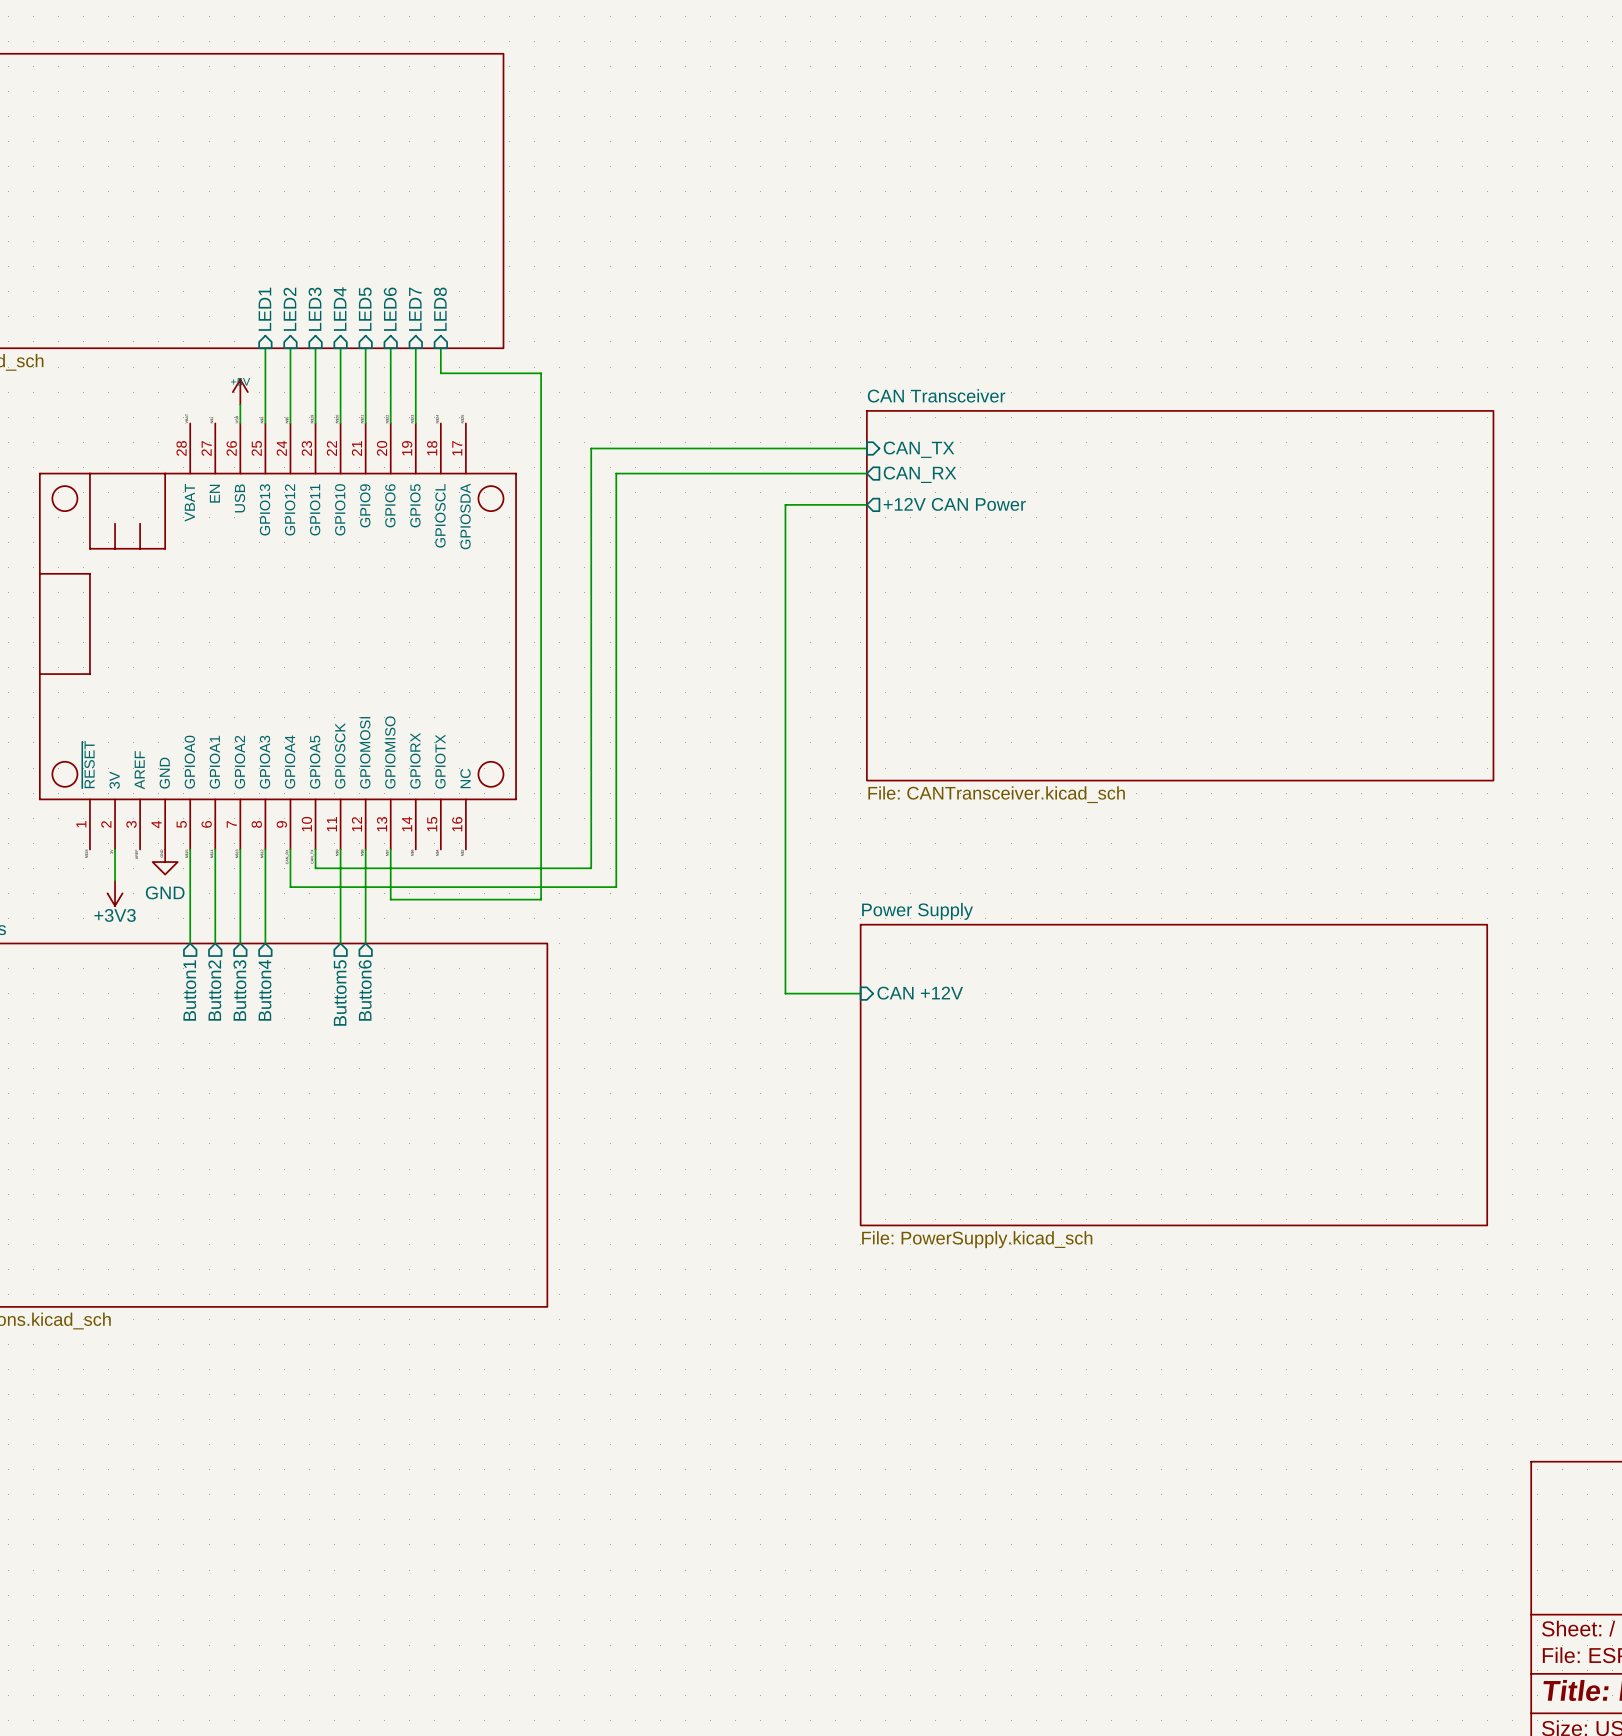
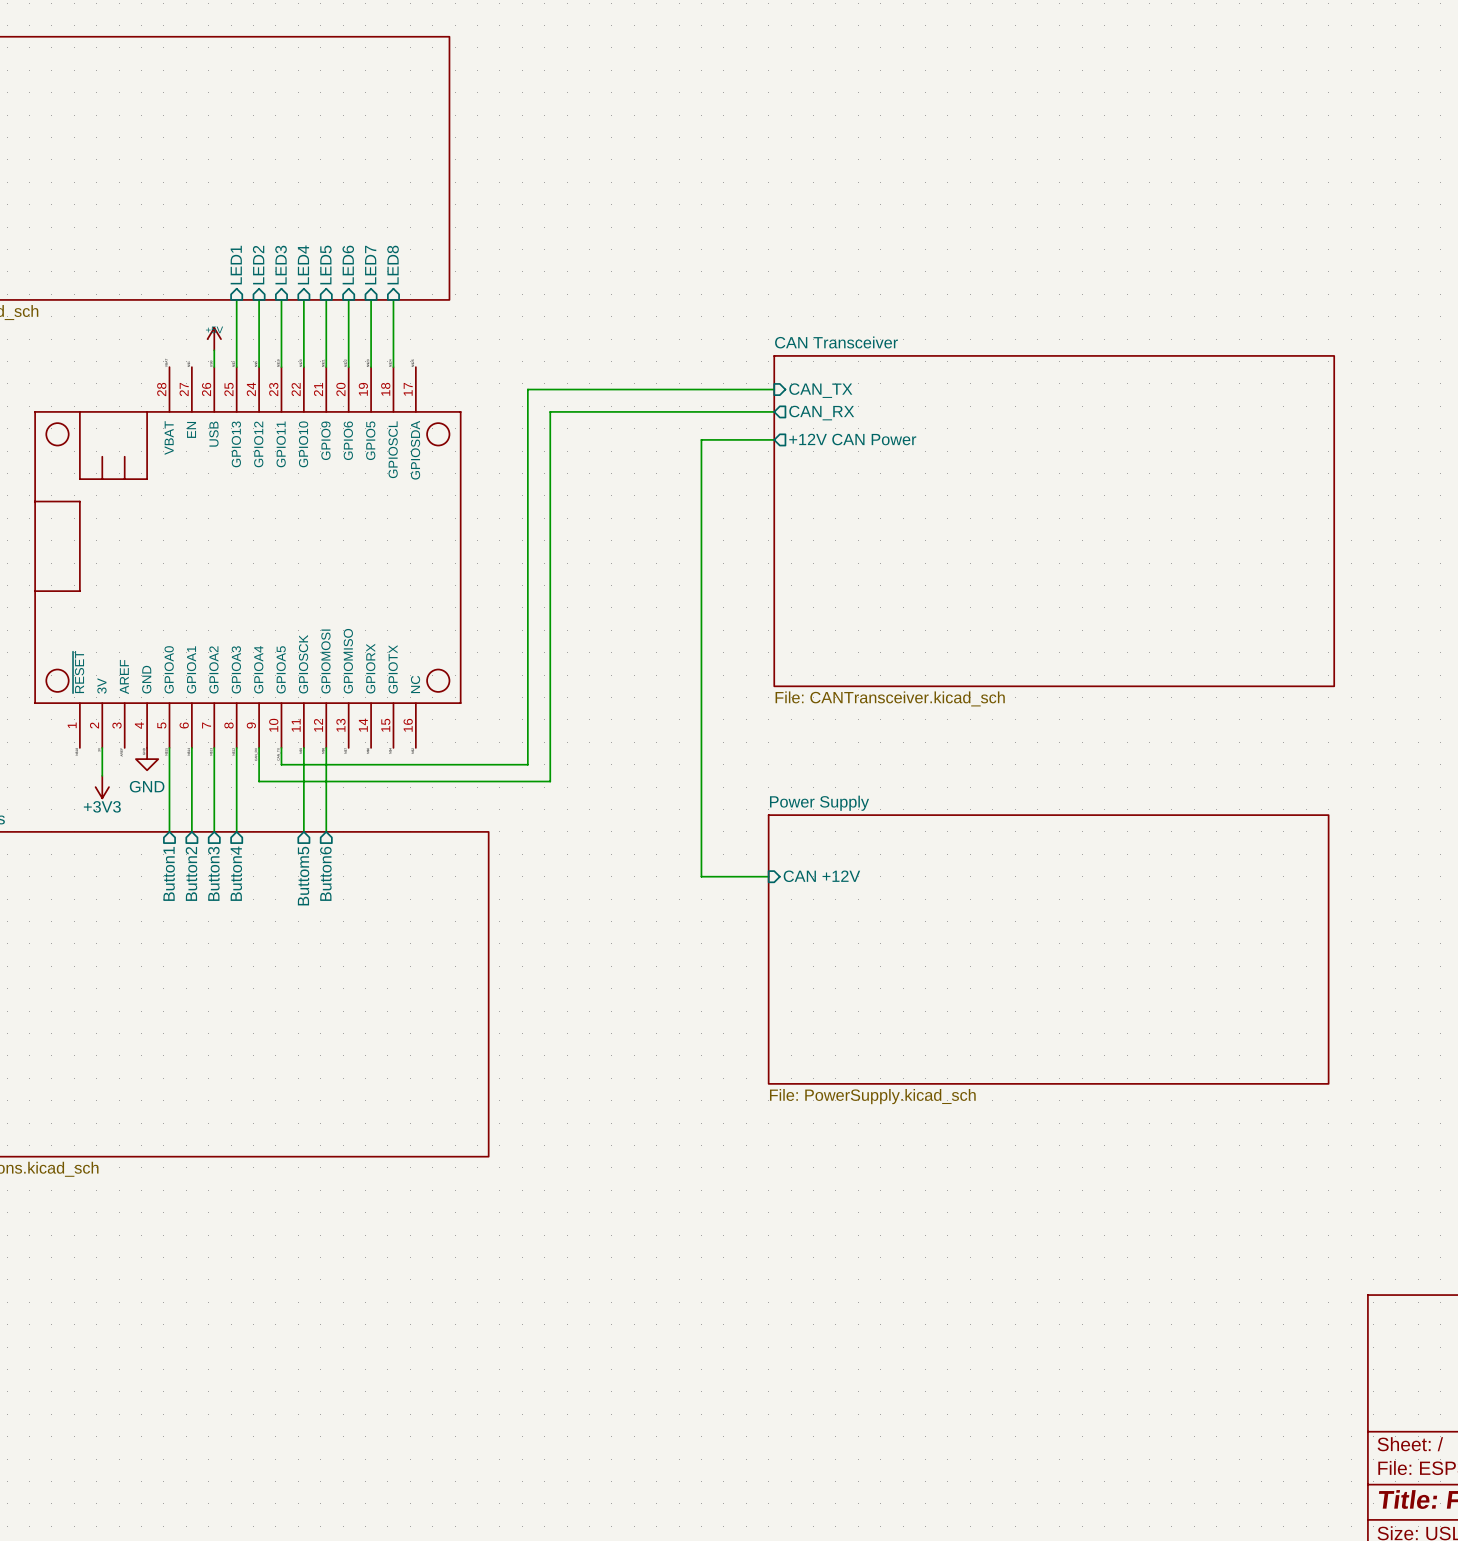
wire: (440, 373) (541, 373) (541, 899) (390, 899) (390, 849) -> (393, 322) (393, 367)

